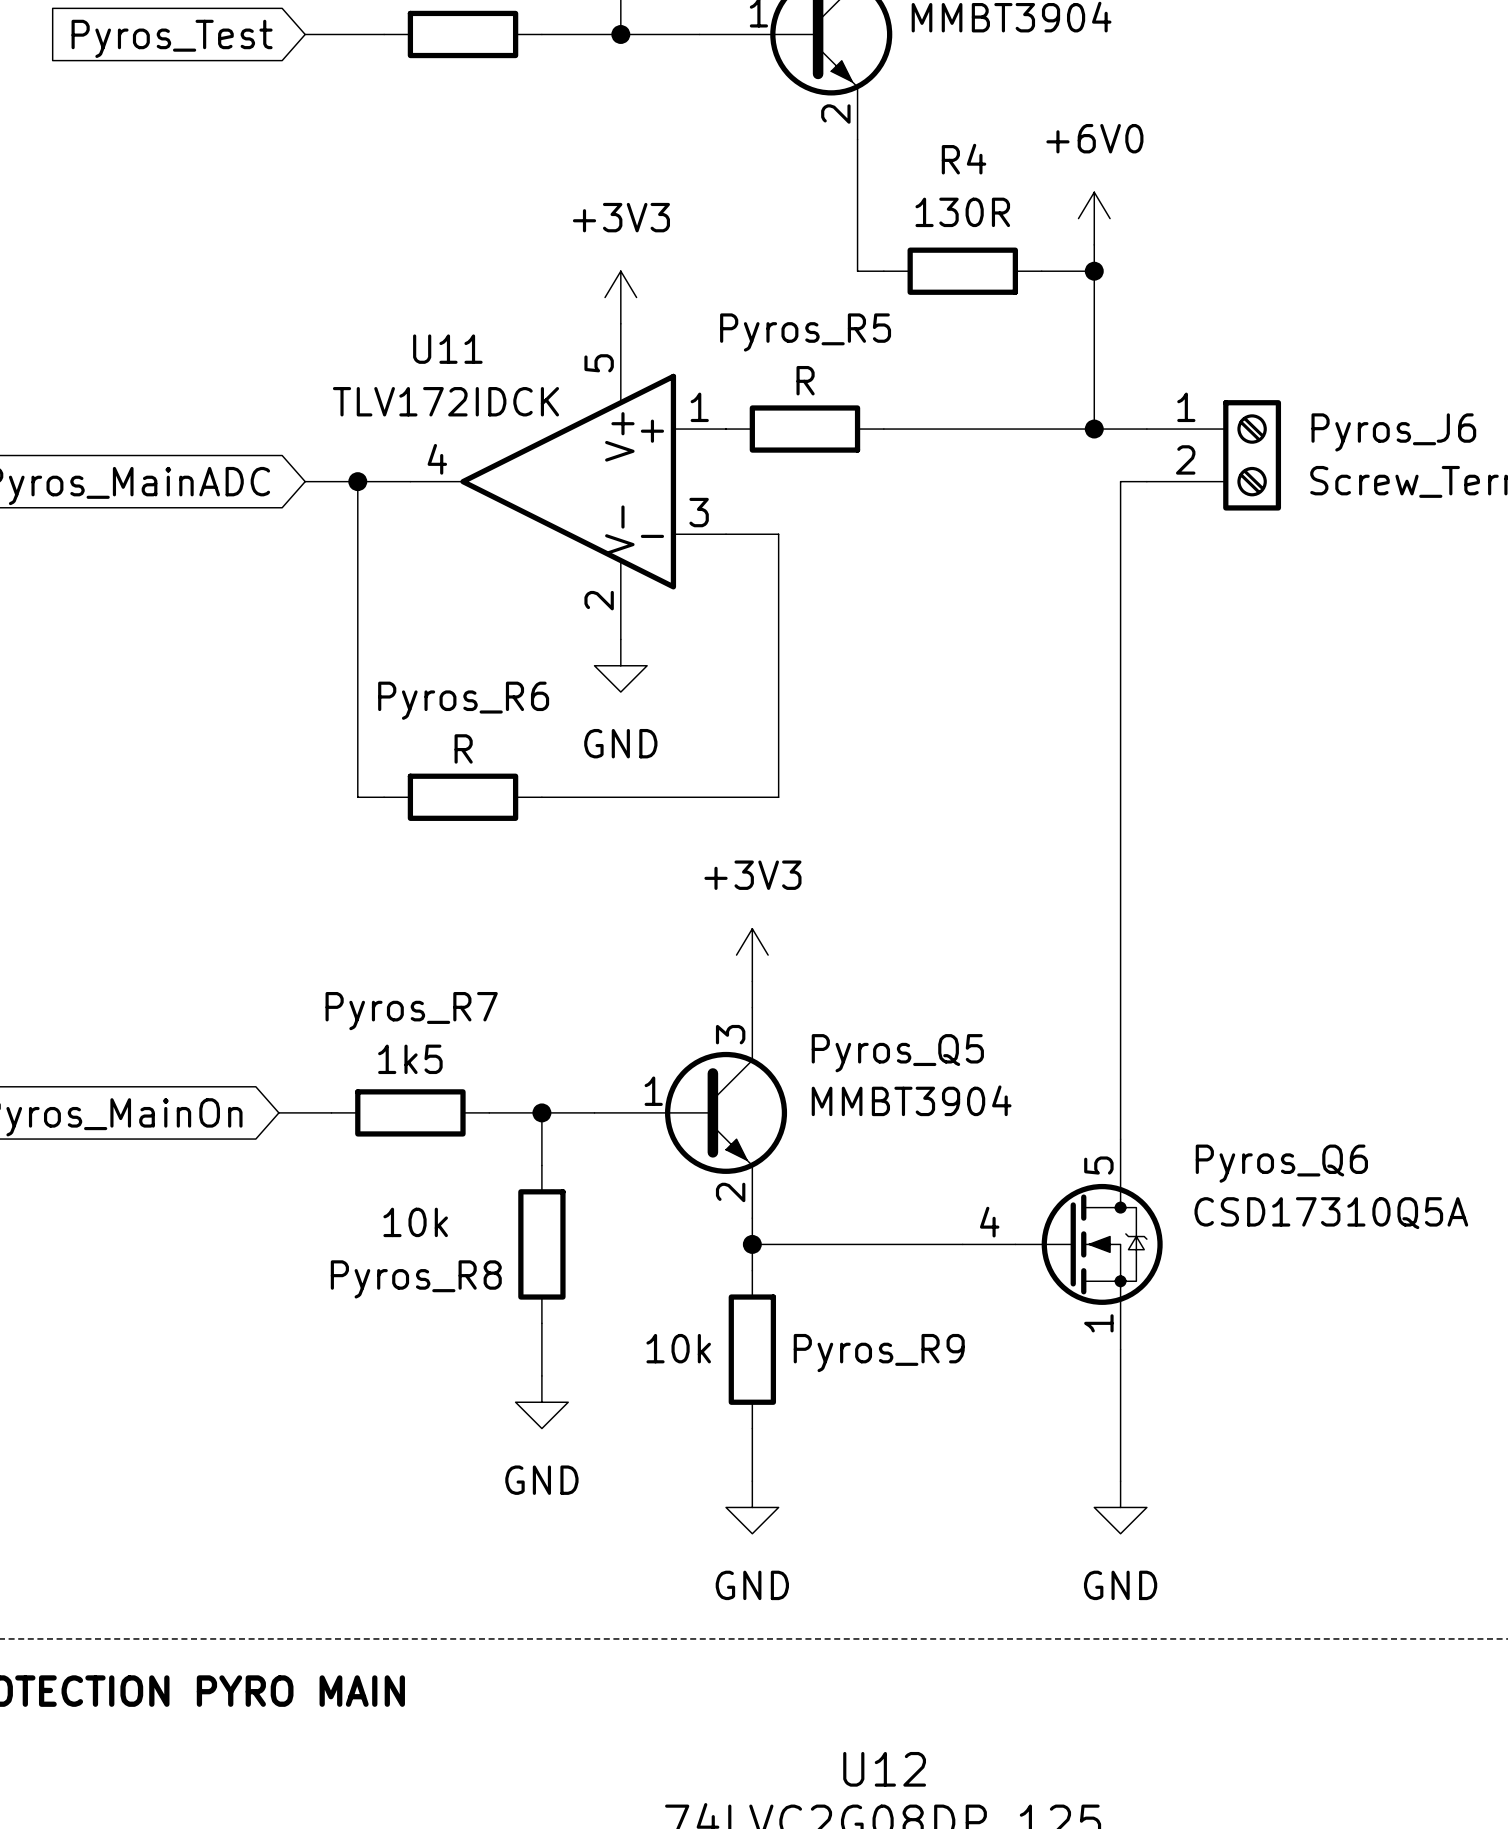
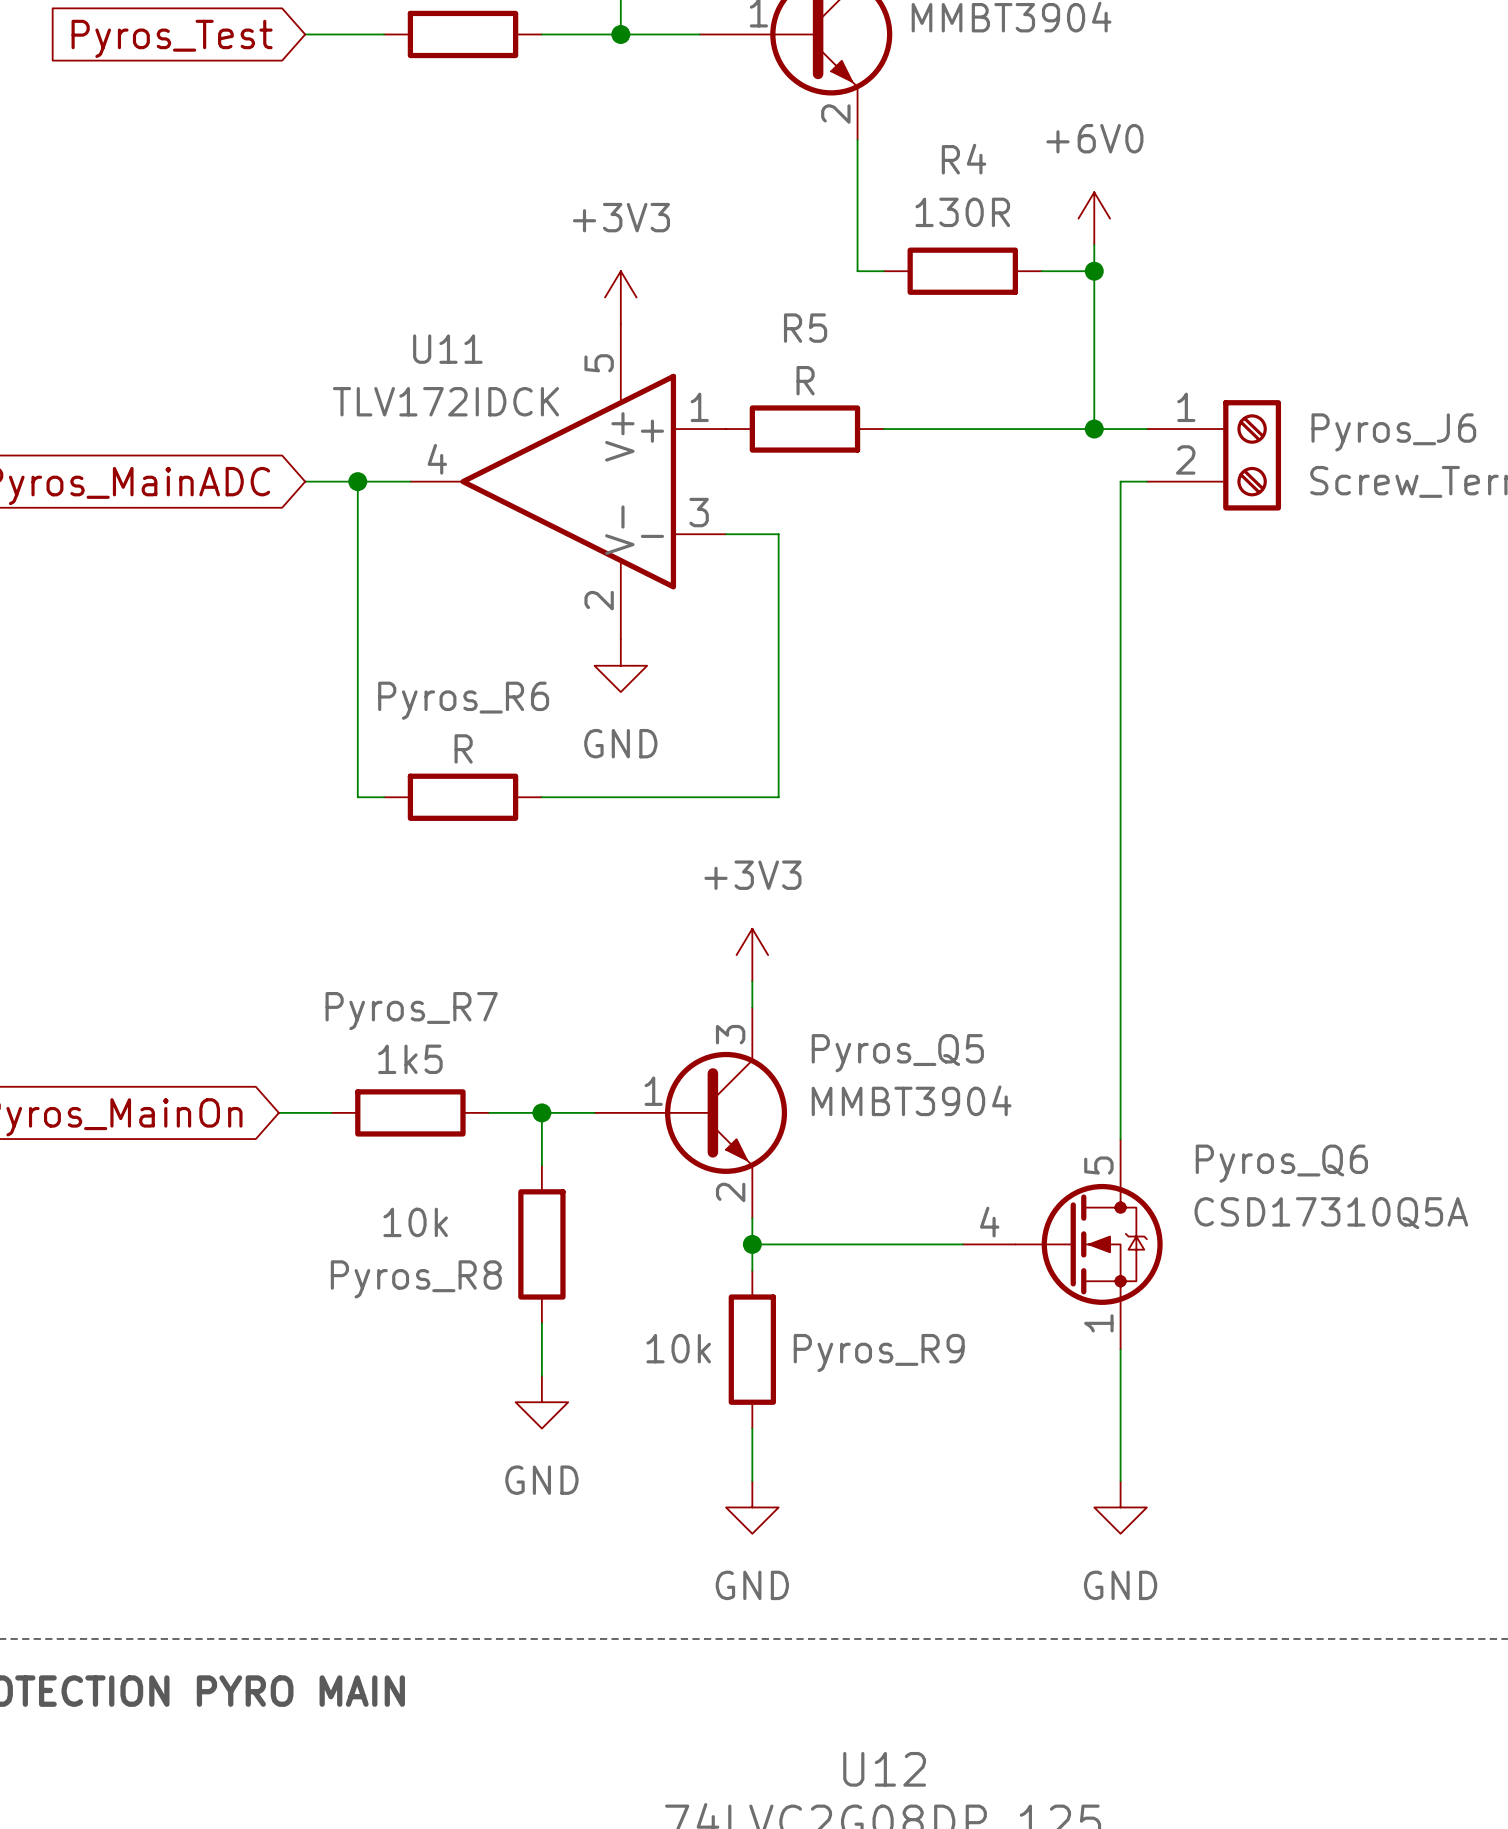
Pyros_R5 name: Pyros_R5 (805, 332) -> R5 (805, 328)

